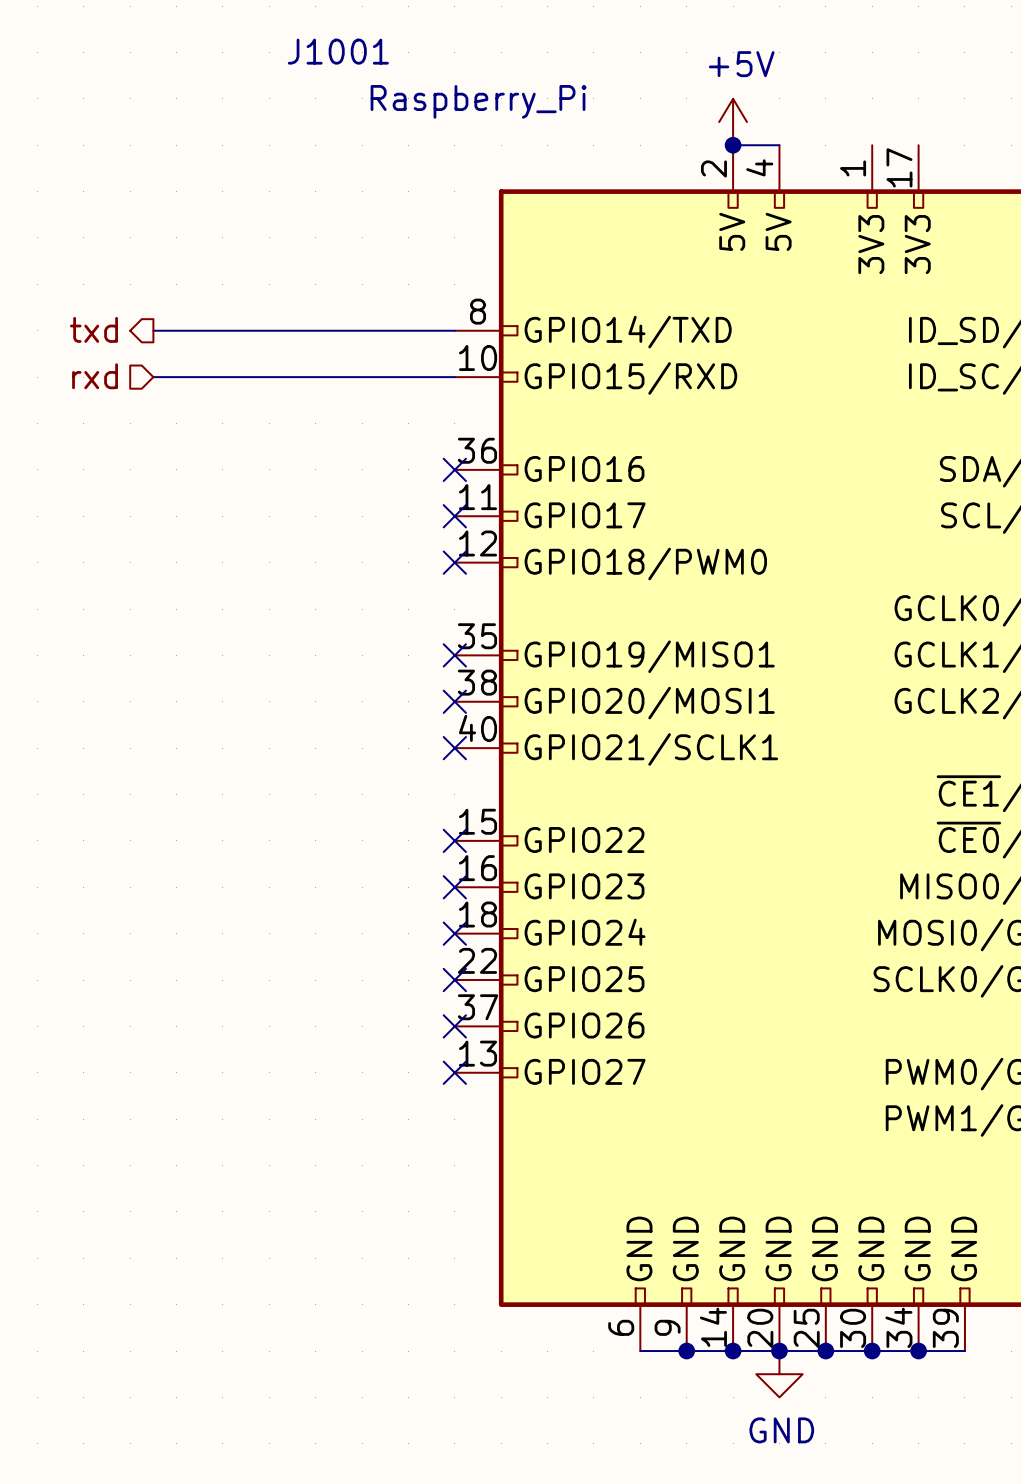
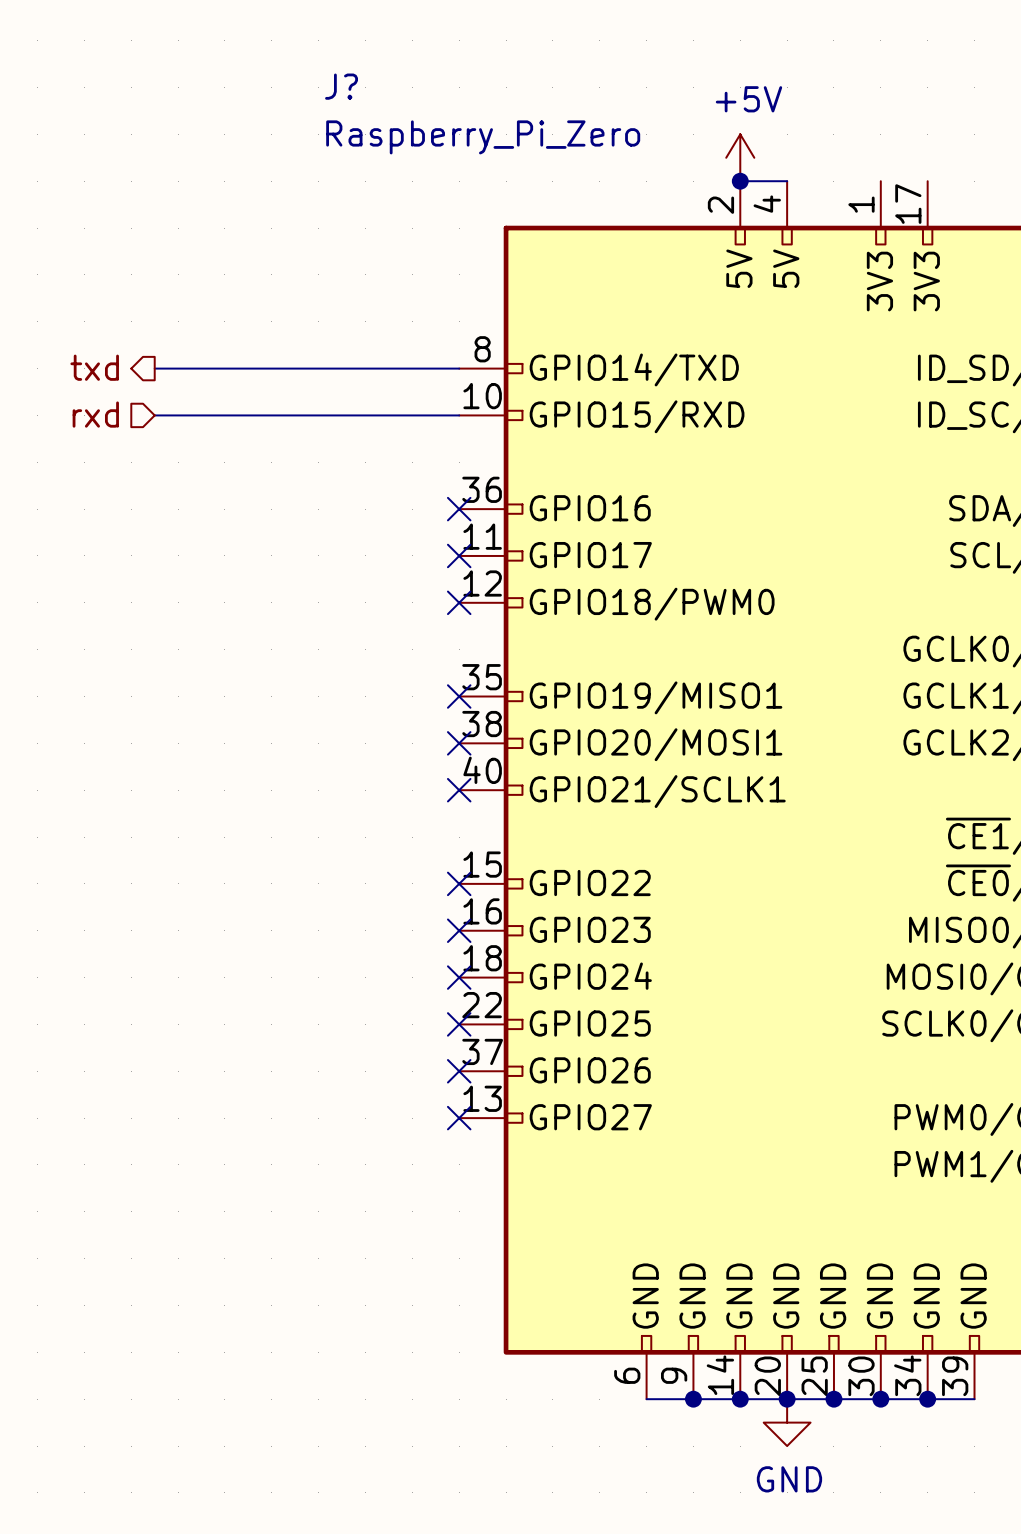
J1001 name: J1001 (338, 51) -> J? (341, 86)
J1001 value: Raspberry_Pi (478, 101) -> Raspberry_Pi_Zero (483, 137)

